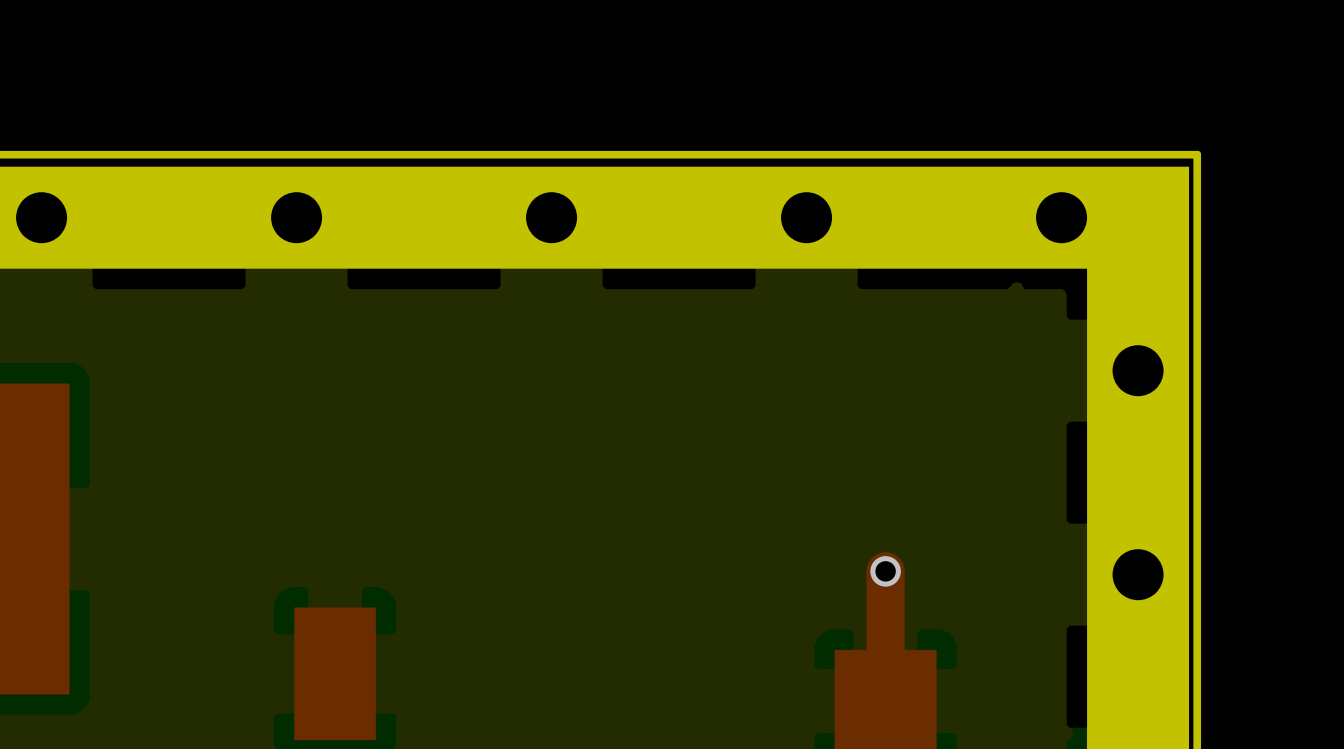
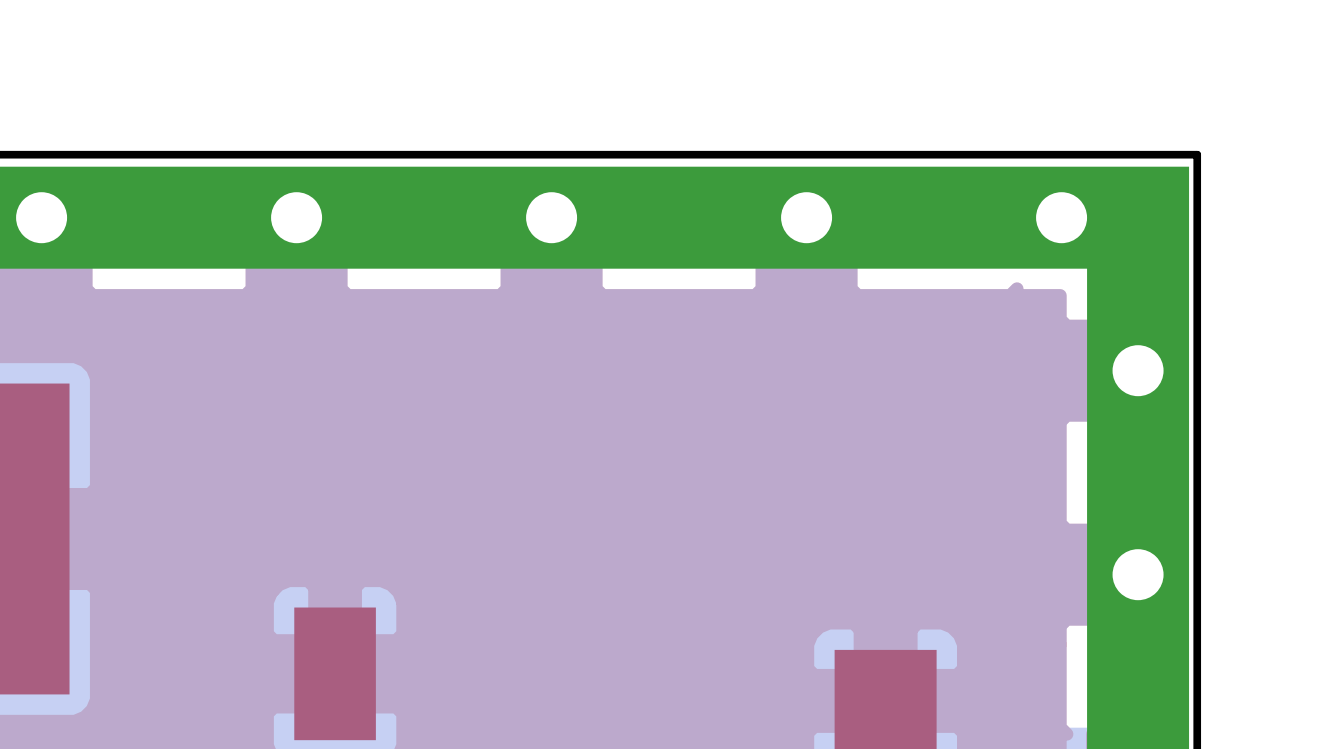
top track: (885, 571) (885, 700) -> none
via: (885, 571) -> none

